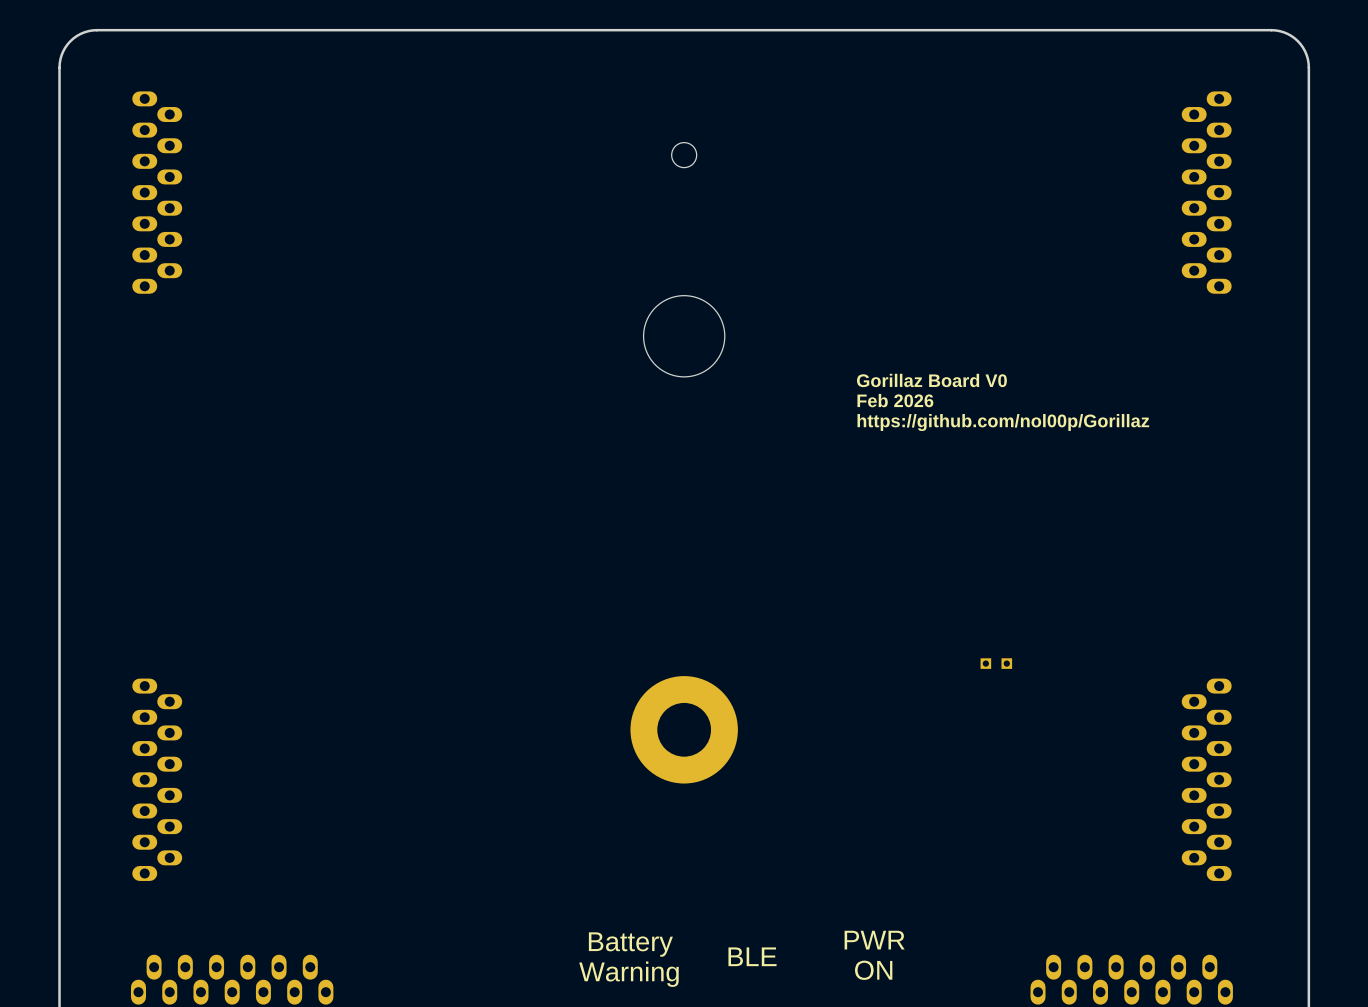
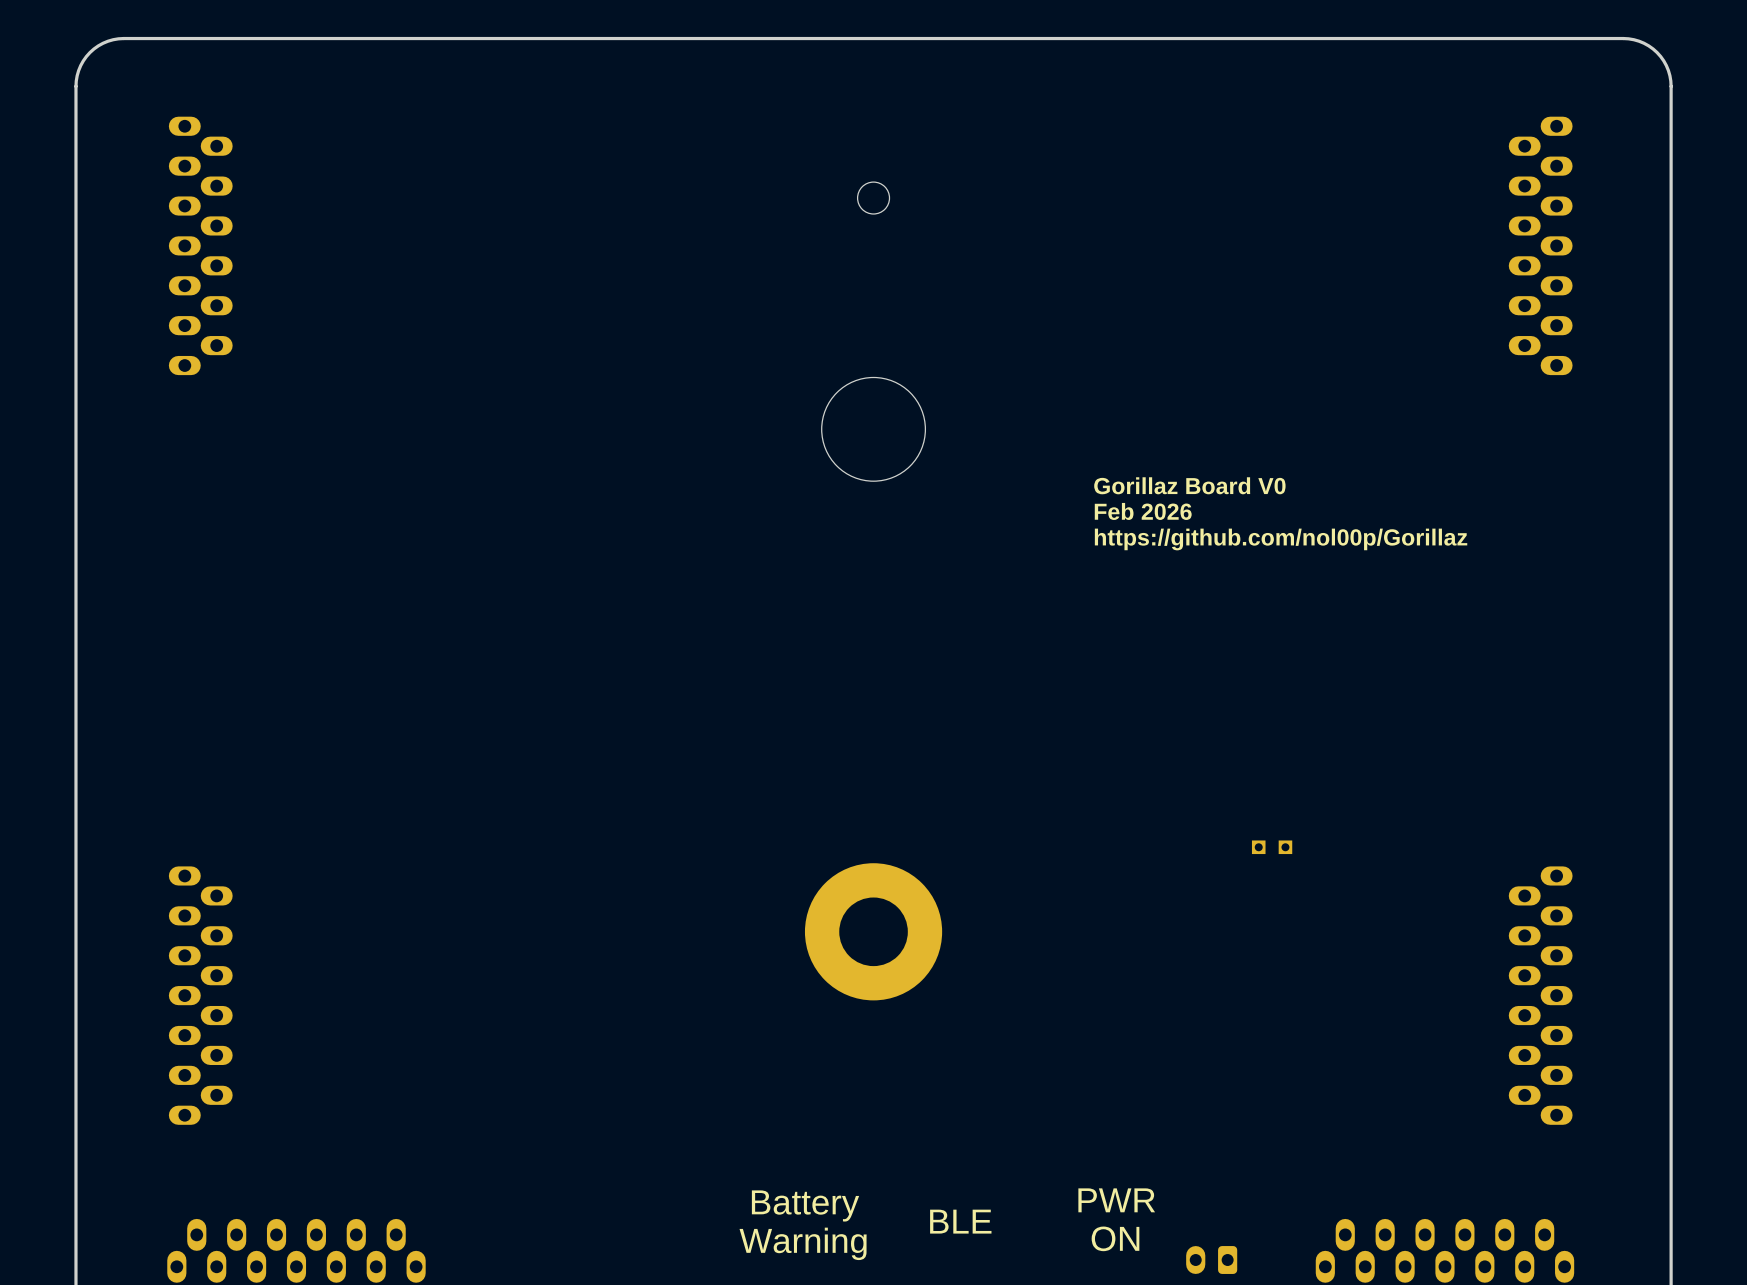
part: none -> (1211, 1260)

